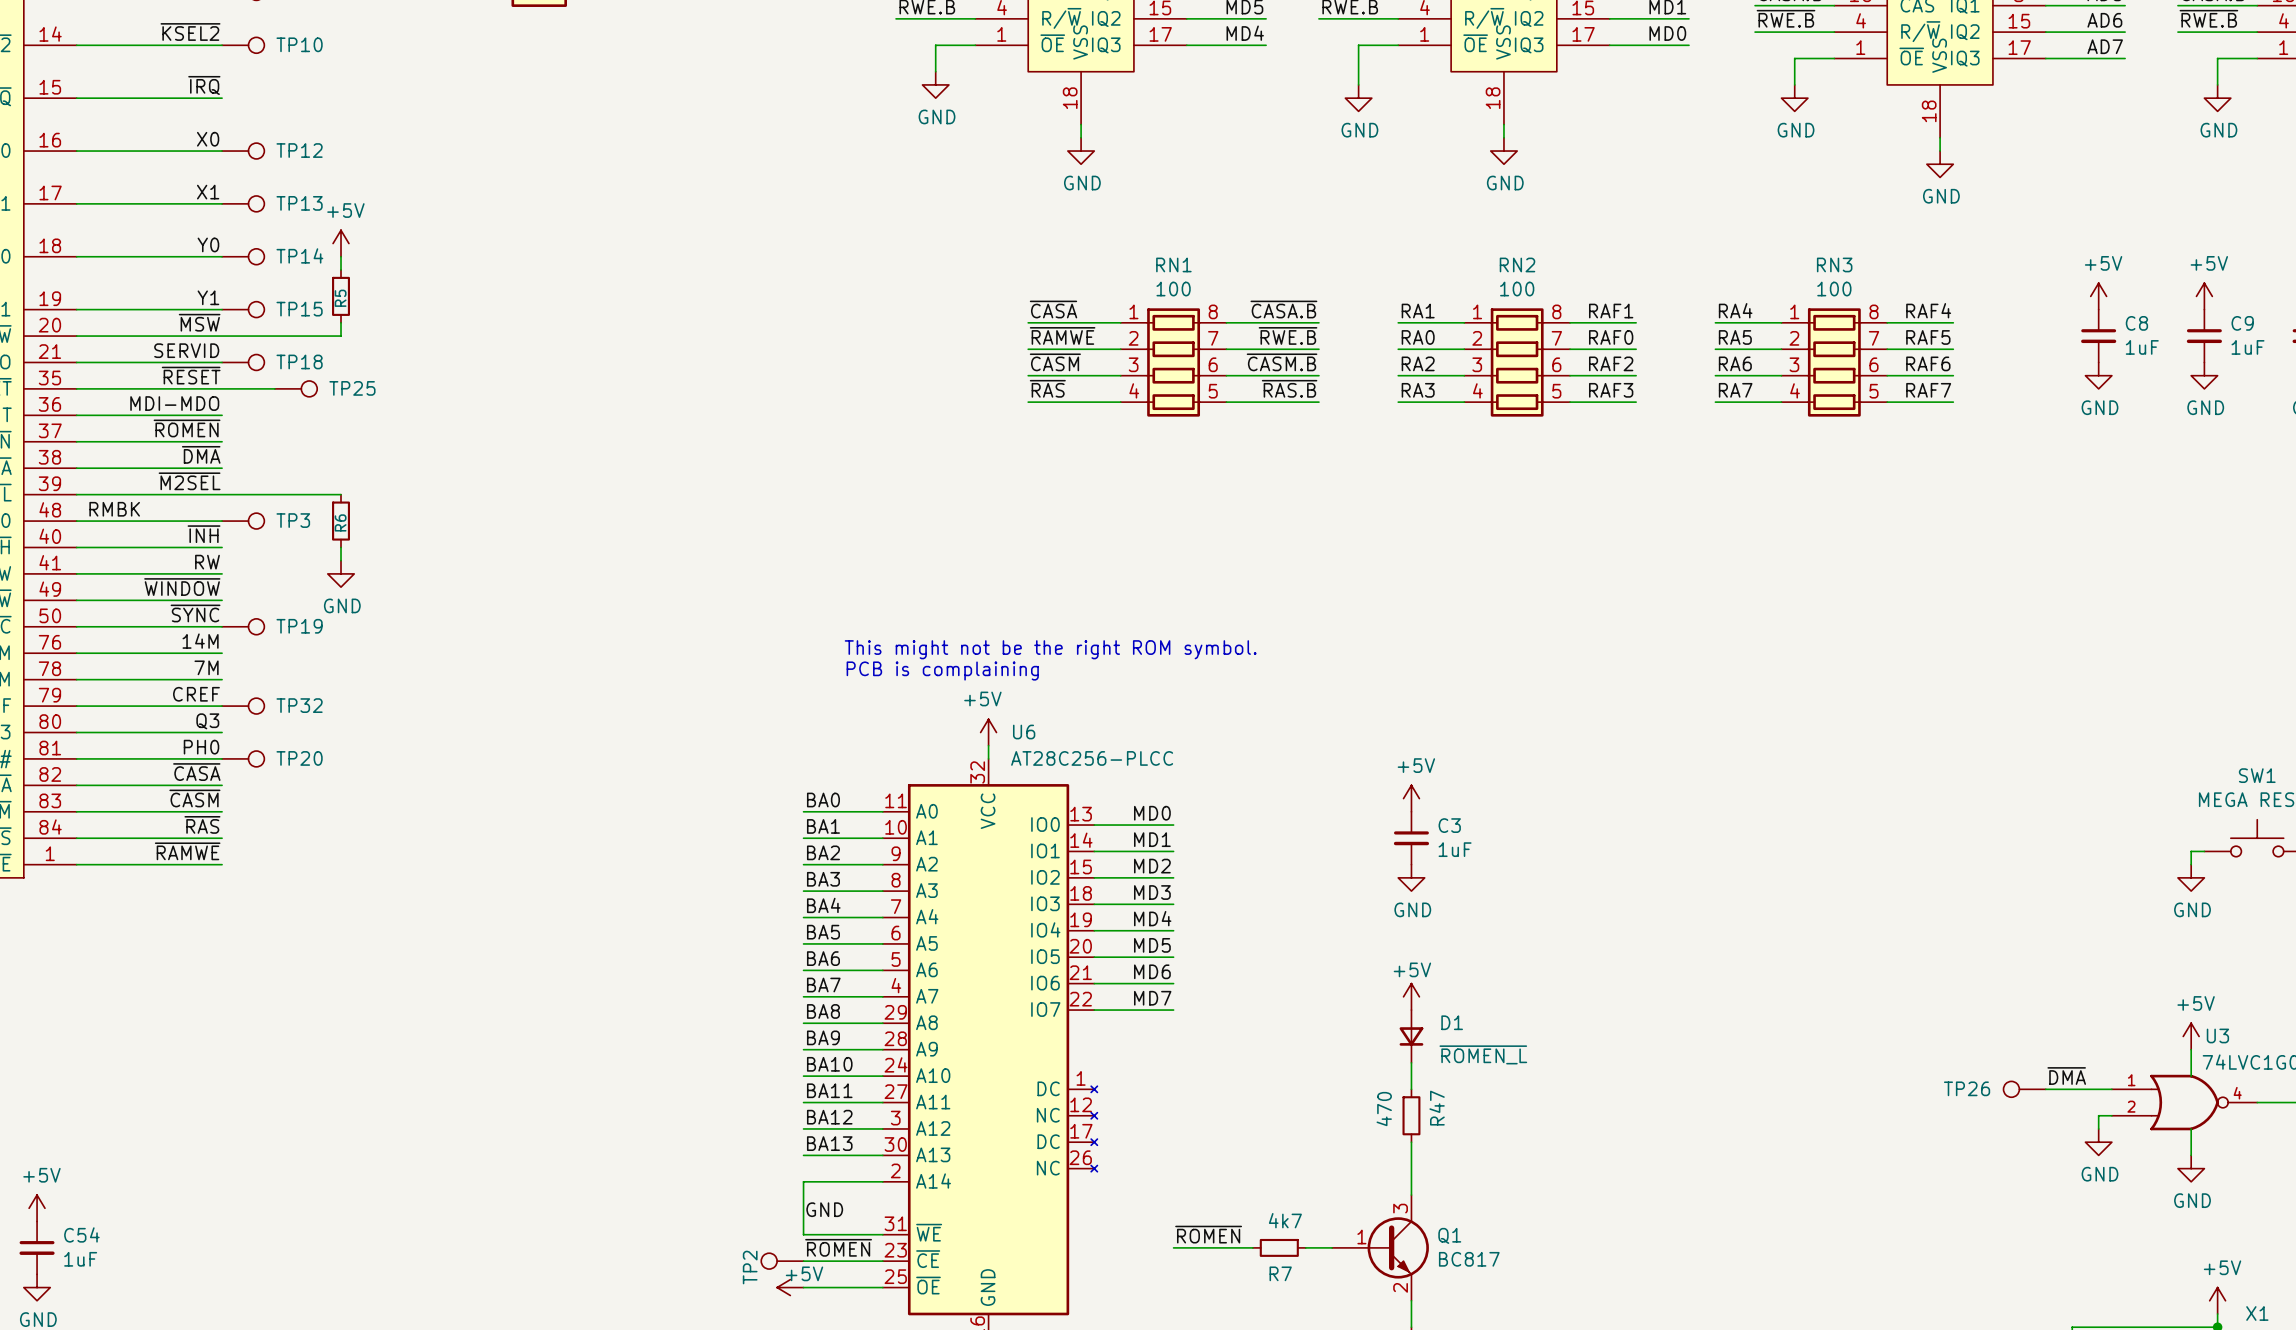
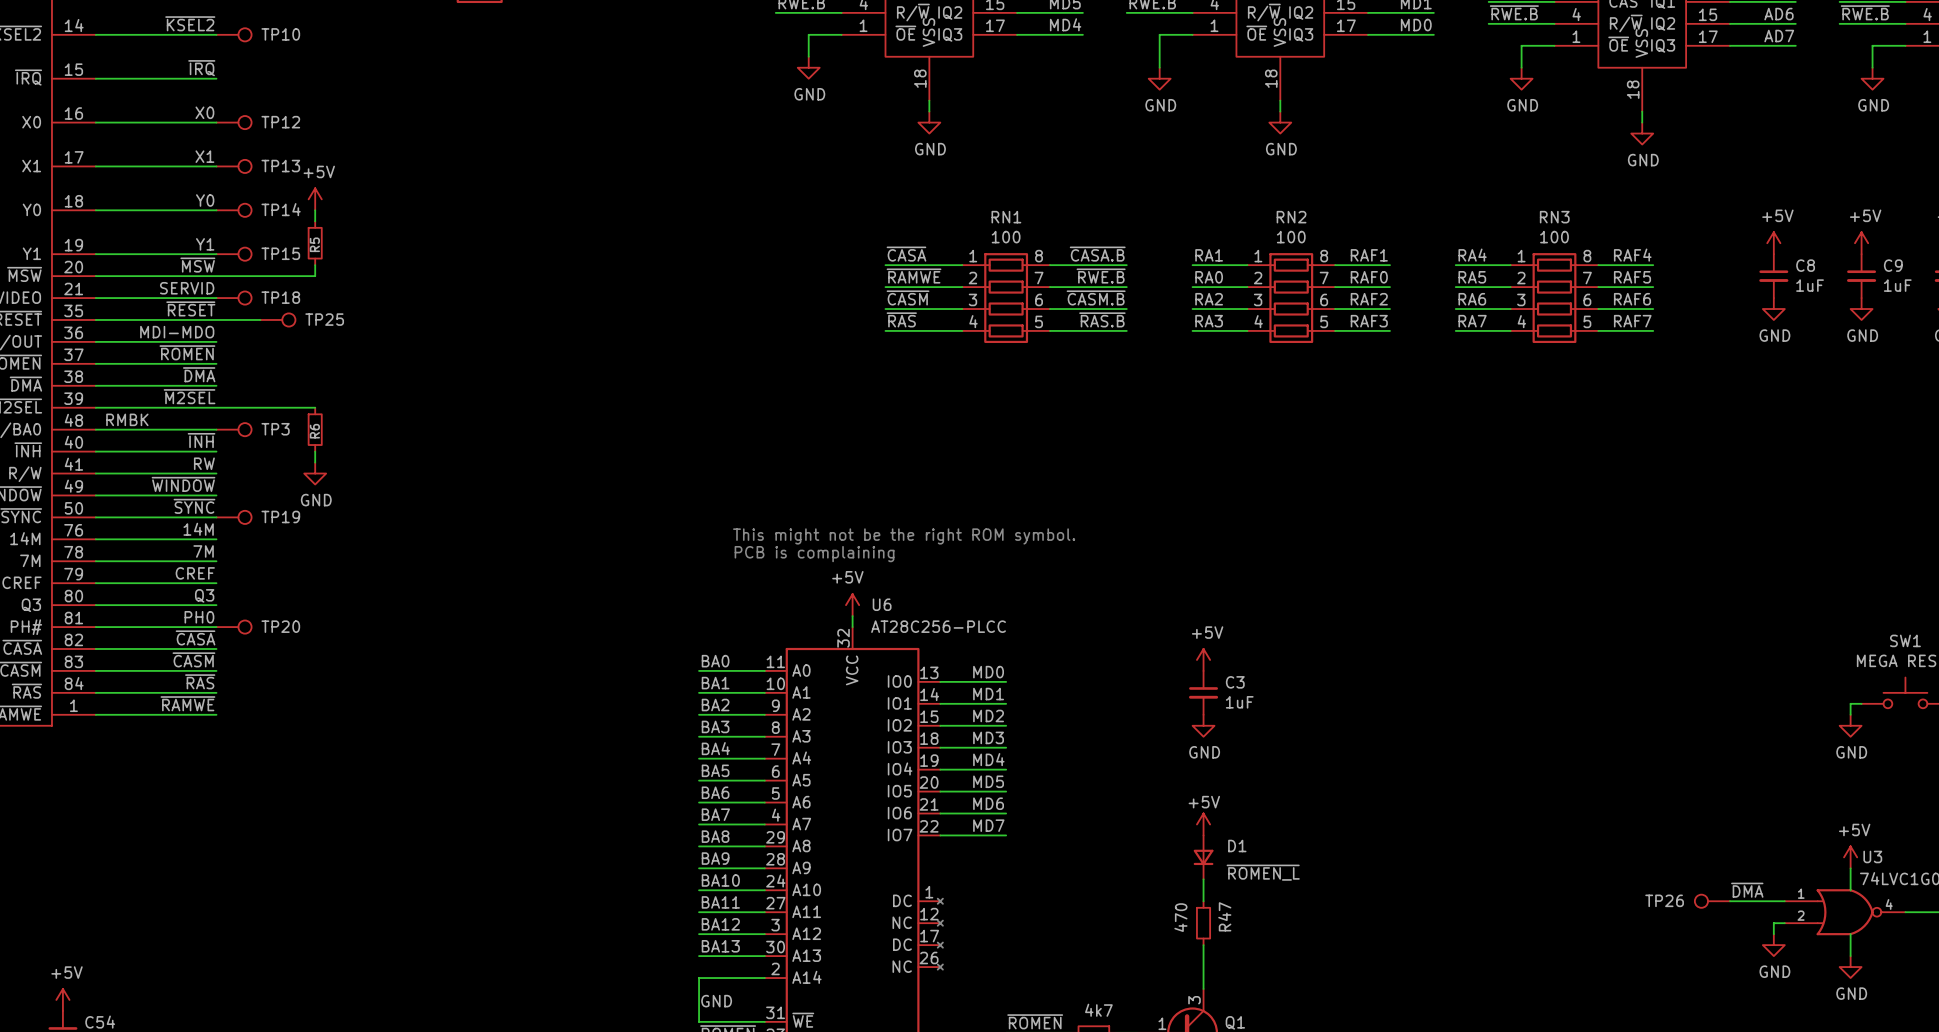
TP32: (243, 706) -> none

